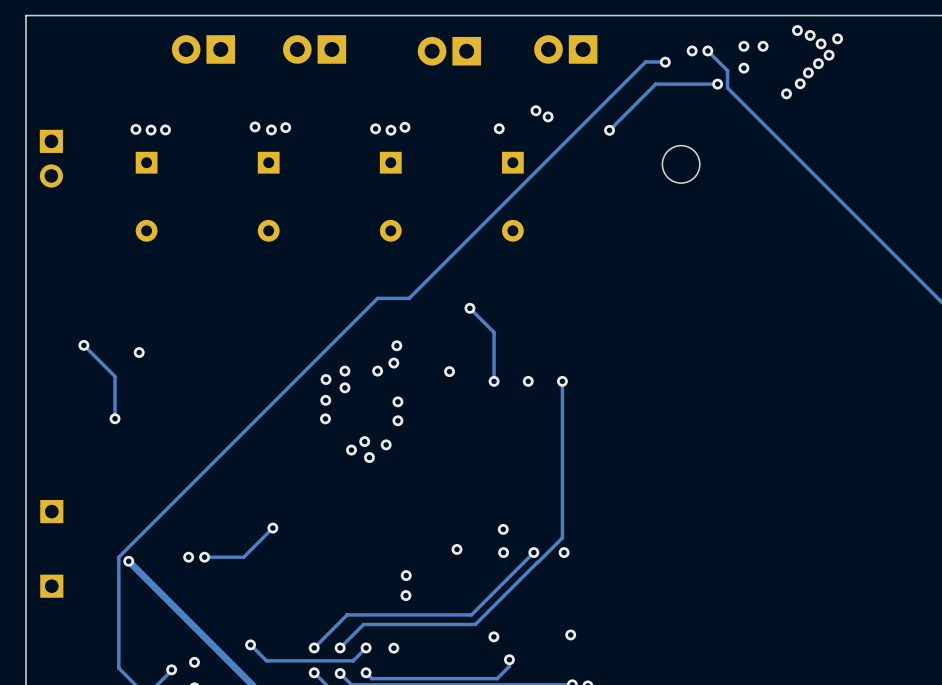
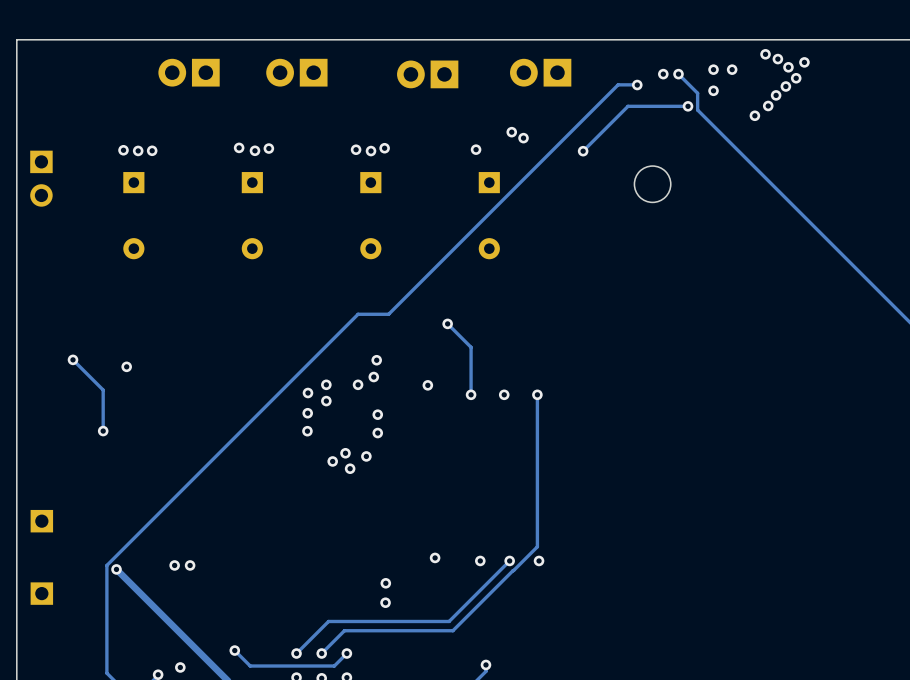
track: (272, 528) (243, 557) (204, 557) -> none
via: (272, 528) -> none
via: (503, 529) -> none
via: (570, 634) -> none
via: (493, 636) -> none
via: (393, 648) -> none

